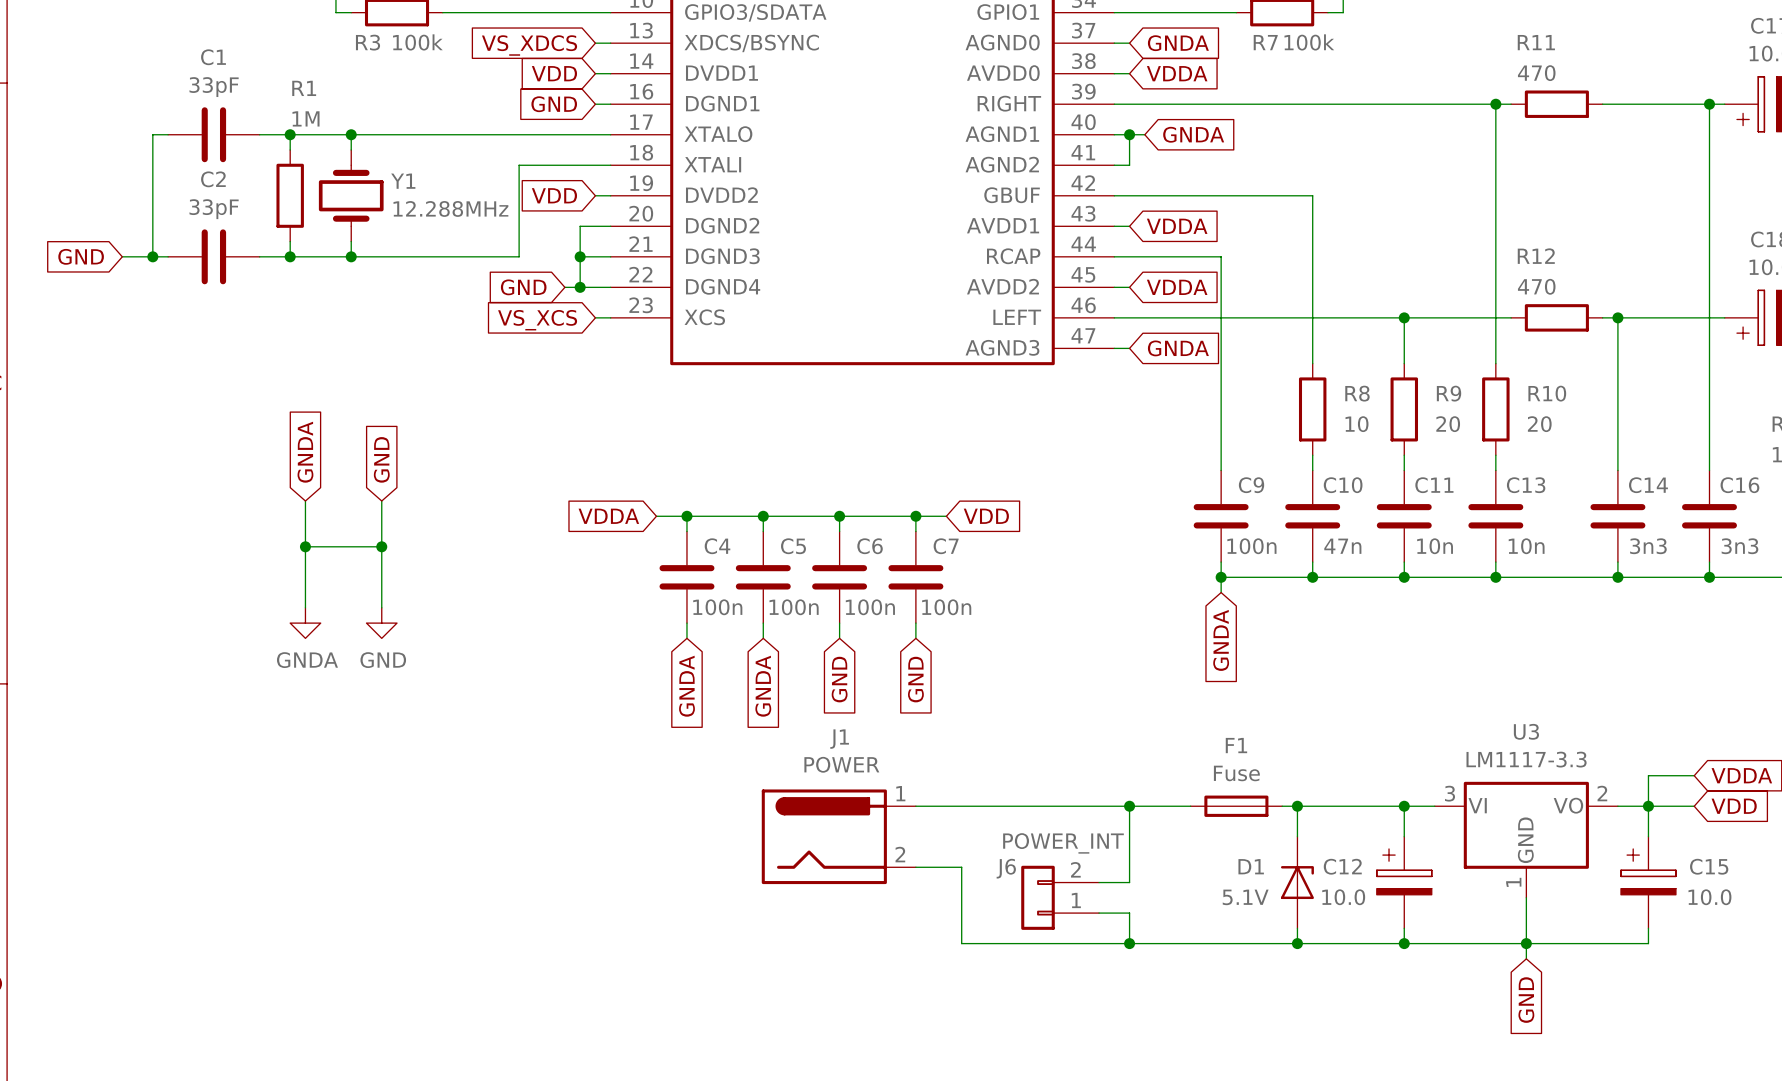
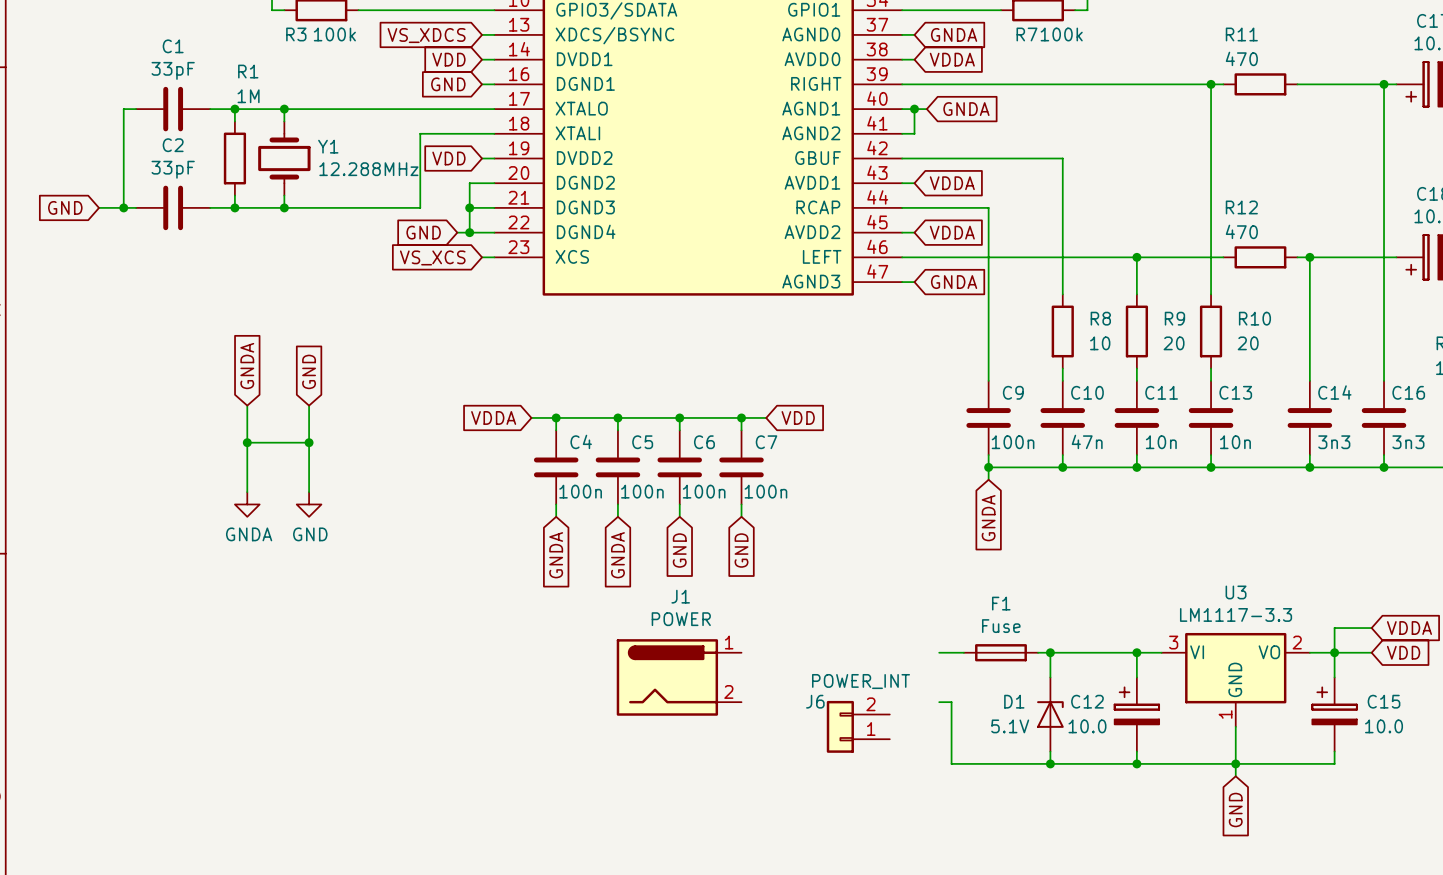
wire: (915, 806) (1160, 806) -> none
wire: (1129, 806) (1129, 882) (1099, 882) -> none
junction: (1129, 806) -> none
wire: (915, 867) (961, 867) (961, 943) (1175, 943) -> (939, 702) (951, 702) (951, 763)
wire: (1099, 913) (1129, 913) (1129, 943) -> none
junction: (1129, 943) -> none

